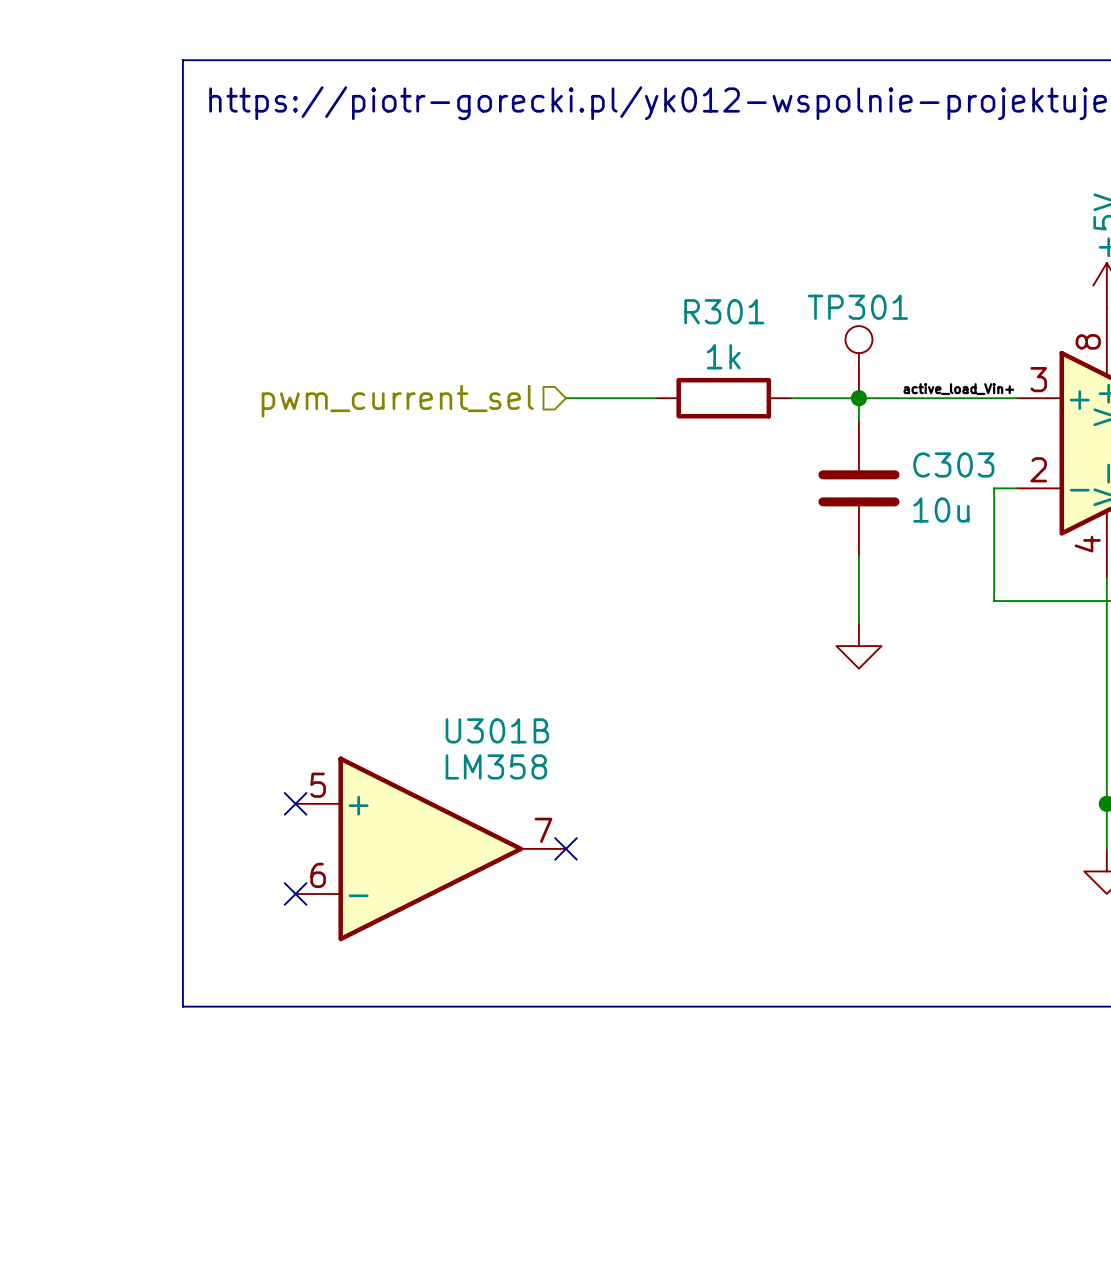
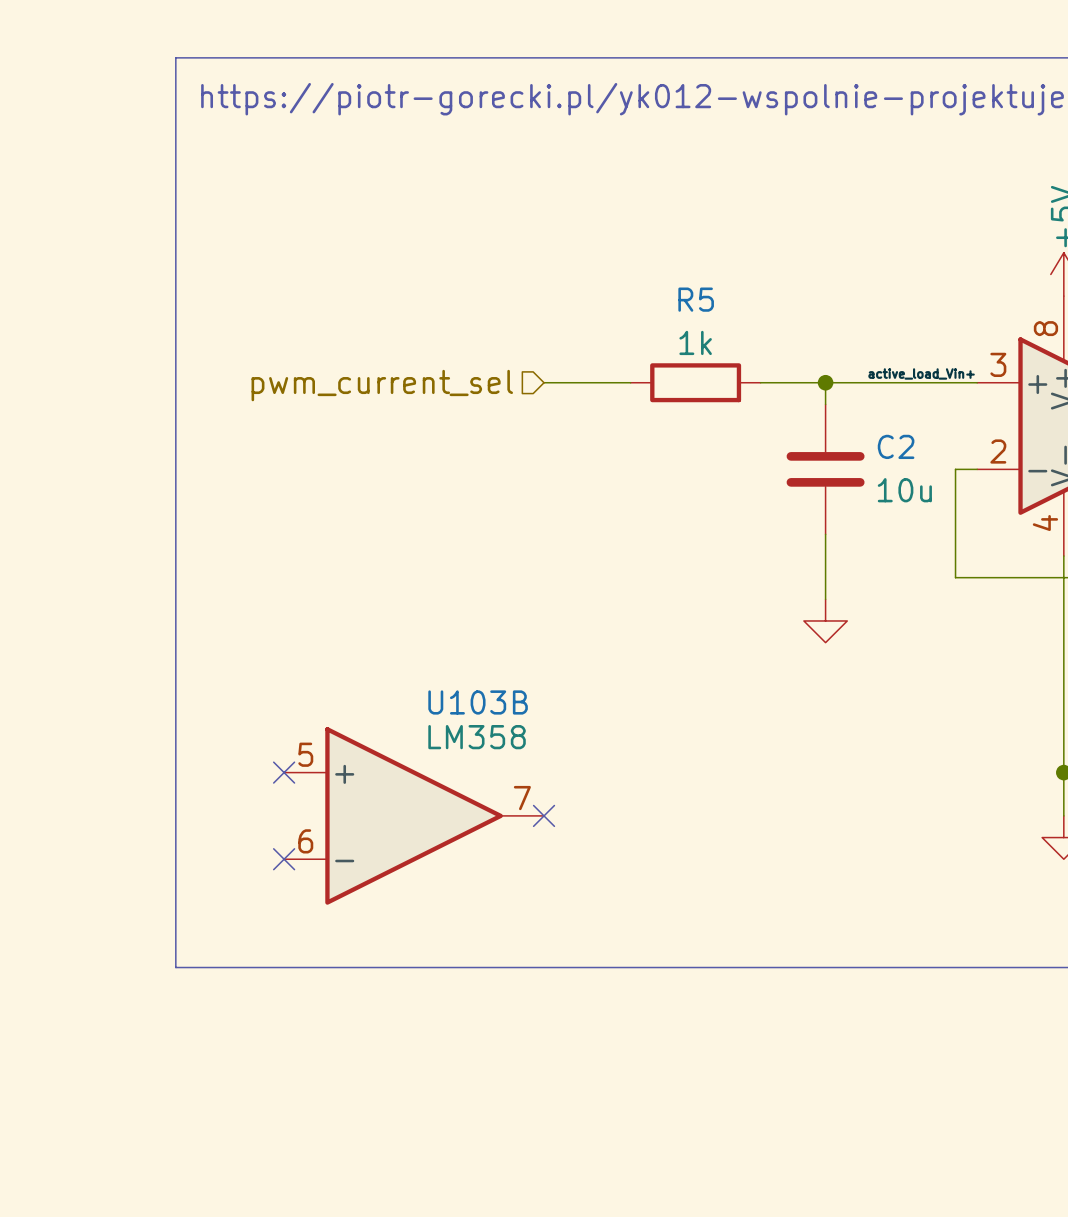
R301 name: R301 (724, 311) -> R5 (696, 299)
TP301: (858, 362) -> none
C303 name: C303 (953, 464) -> C2 (896, 446)
U301B name: U301B (497, 730) -> U103B (478, 702)

